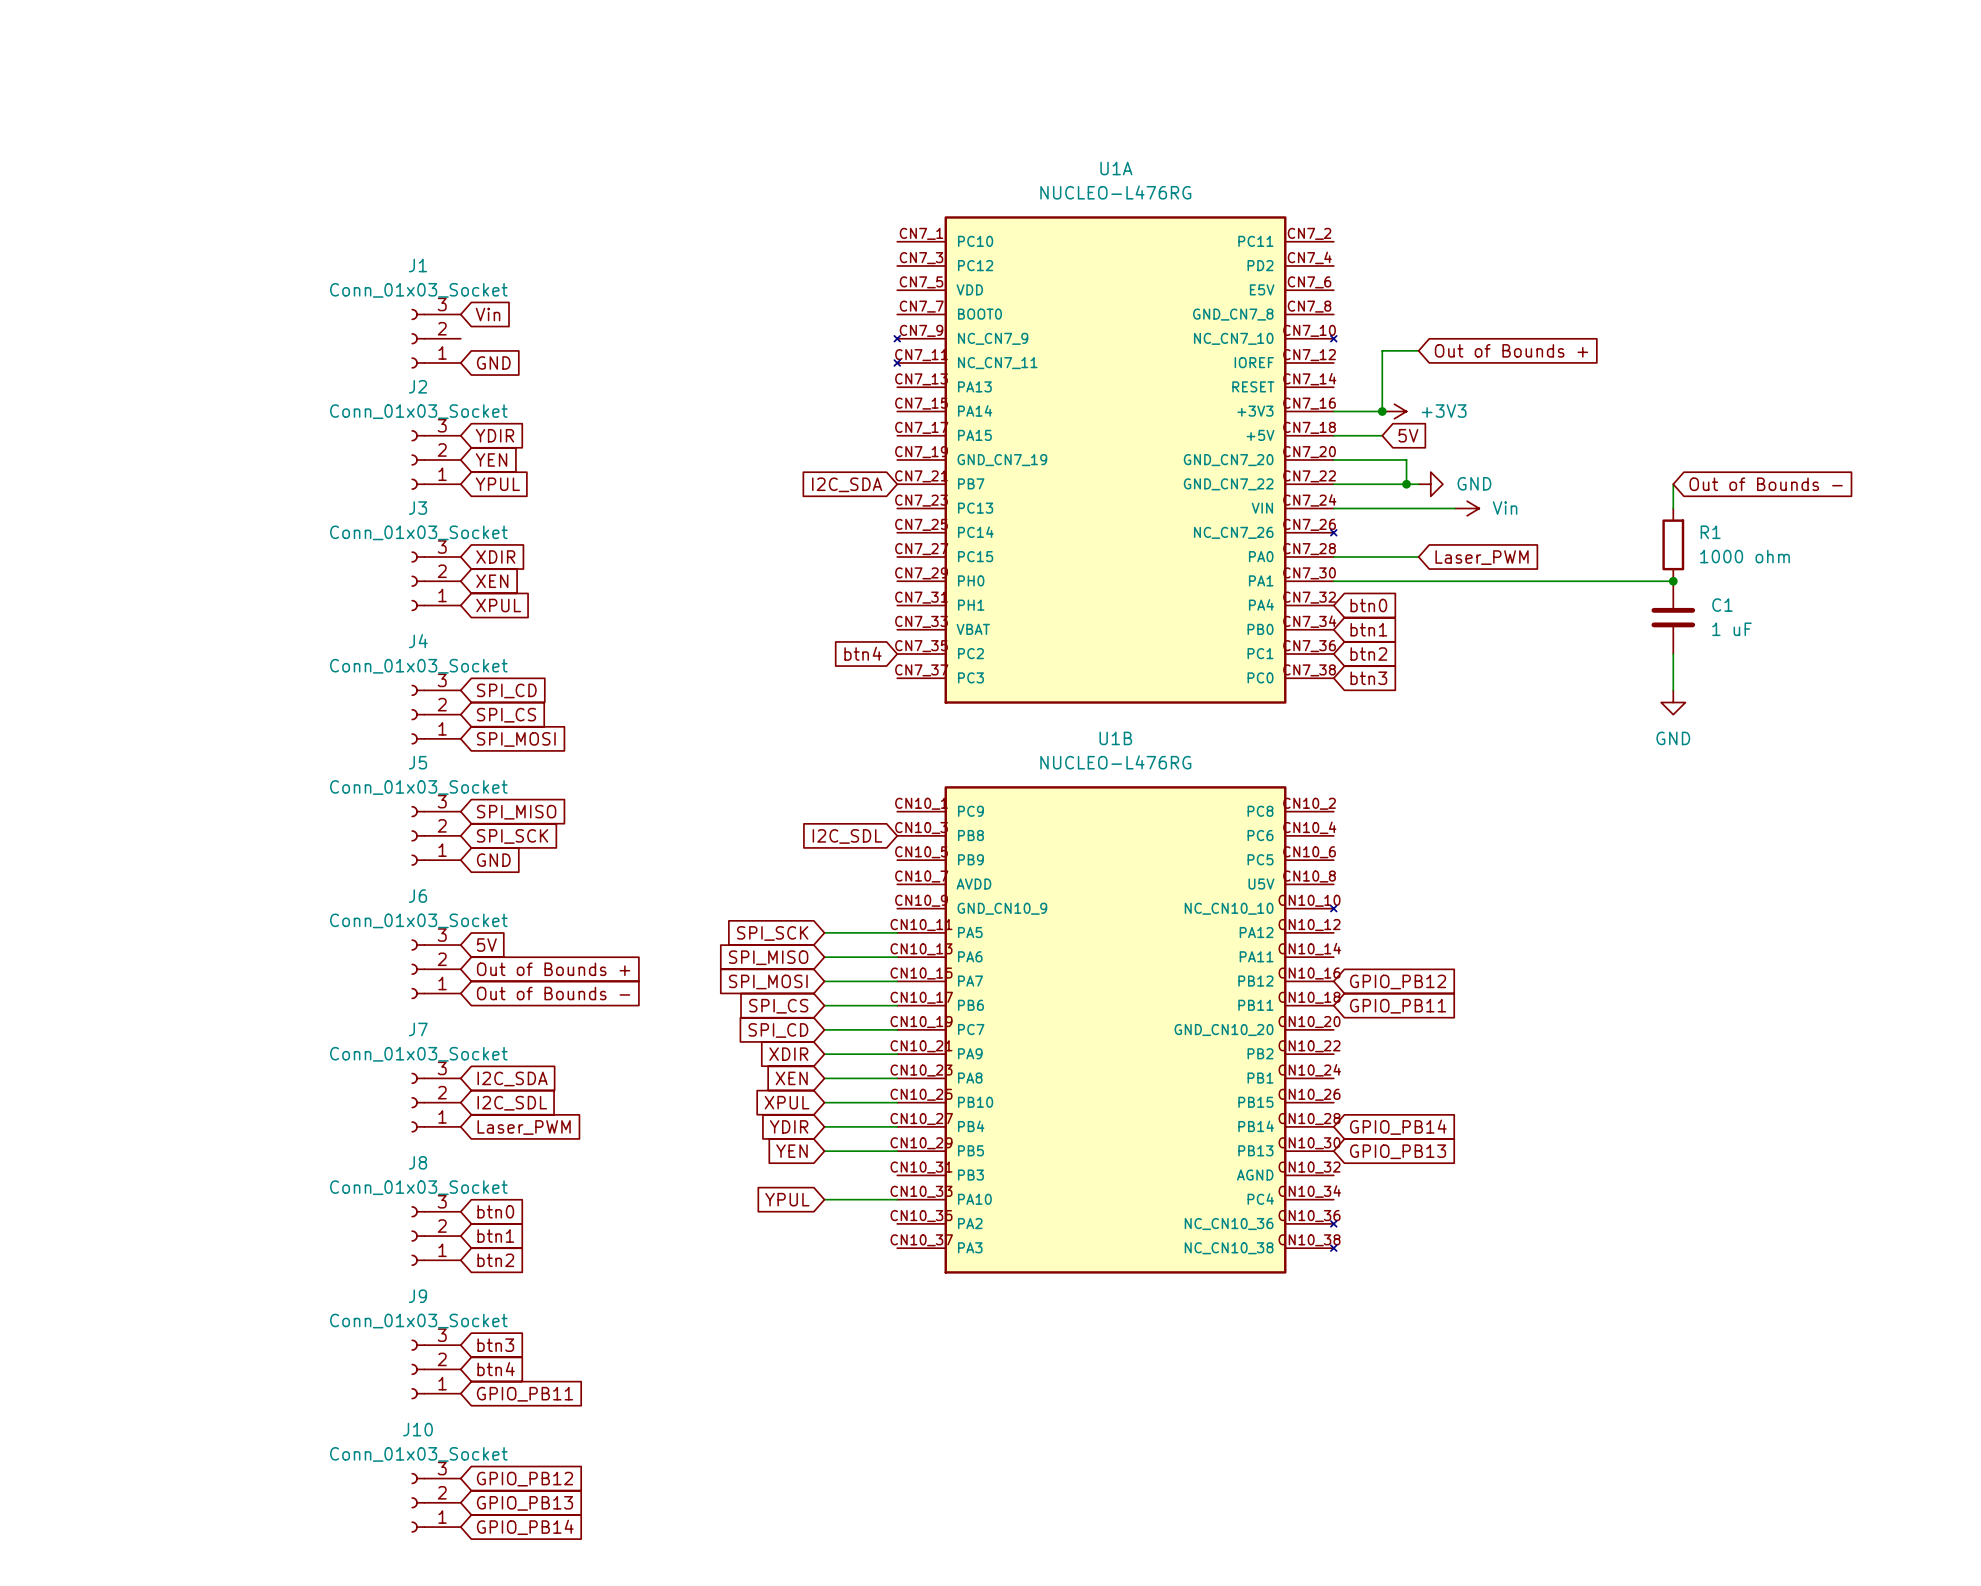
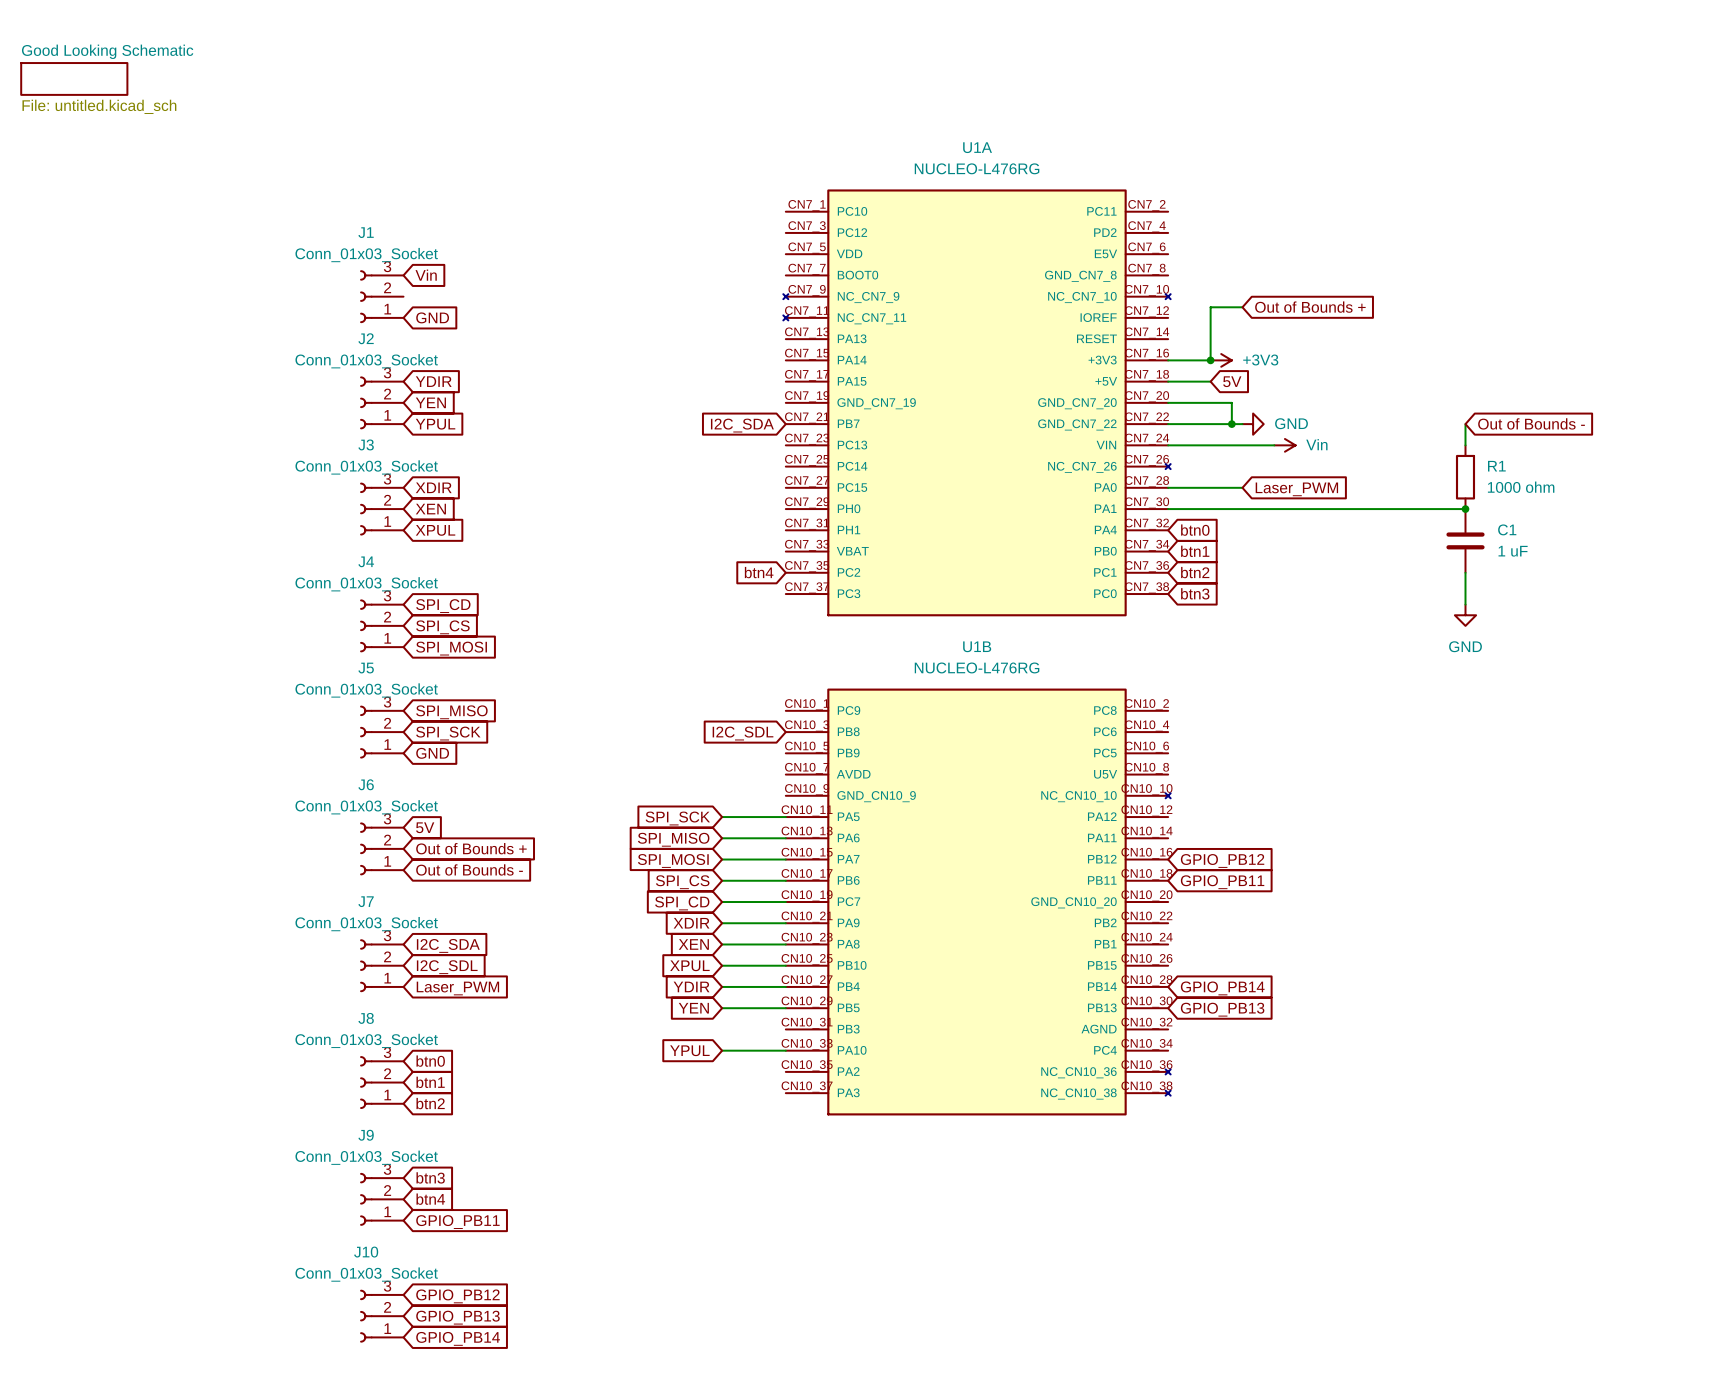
sheet Good Looking Schematic: none -> File: untitled.kicad_sch (74, 78)

